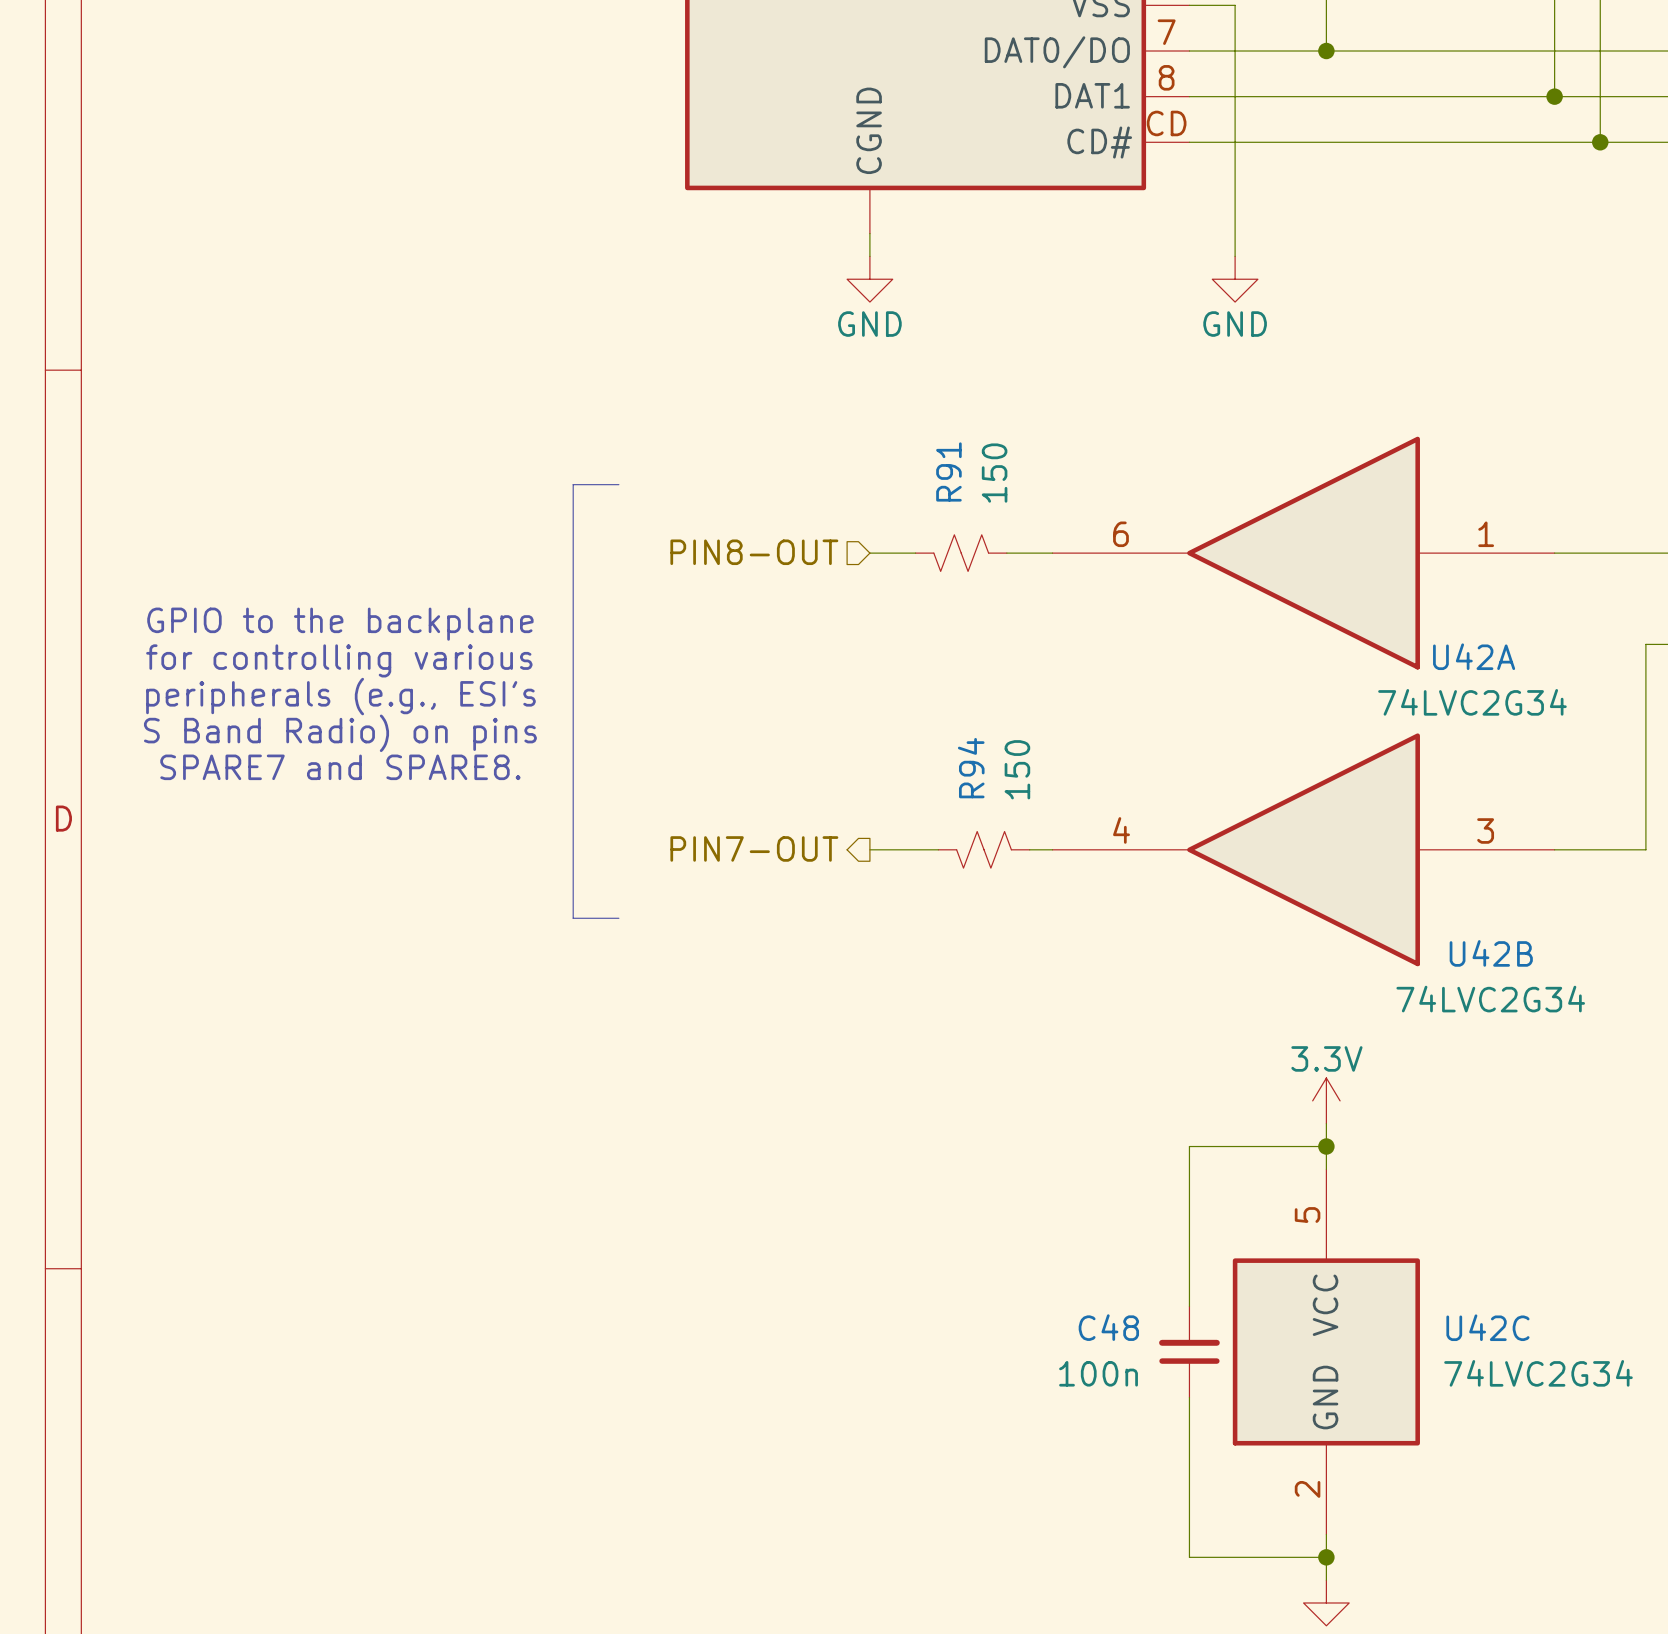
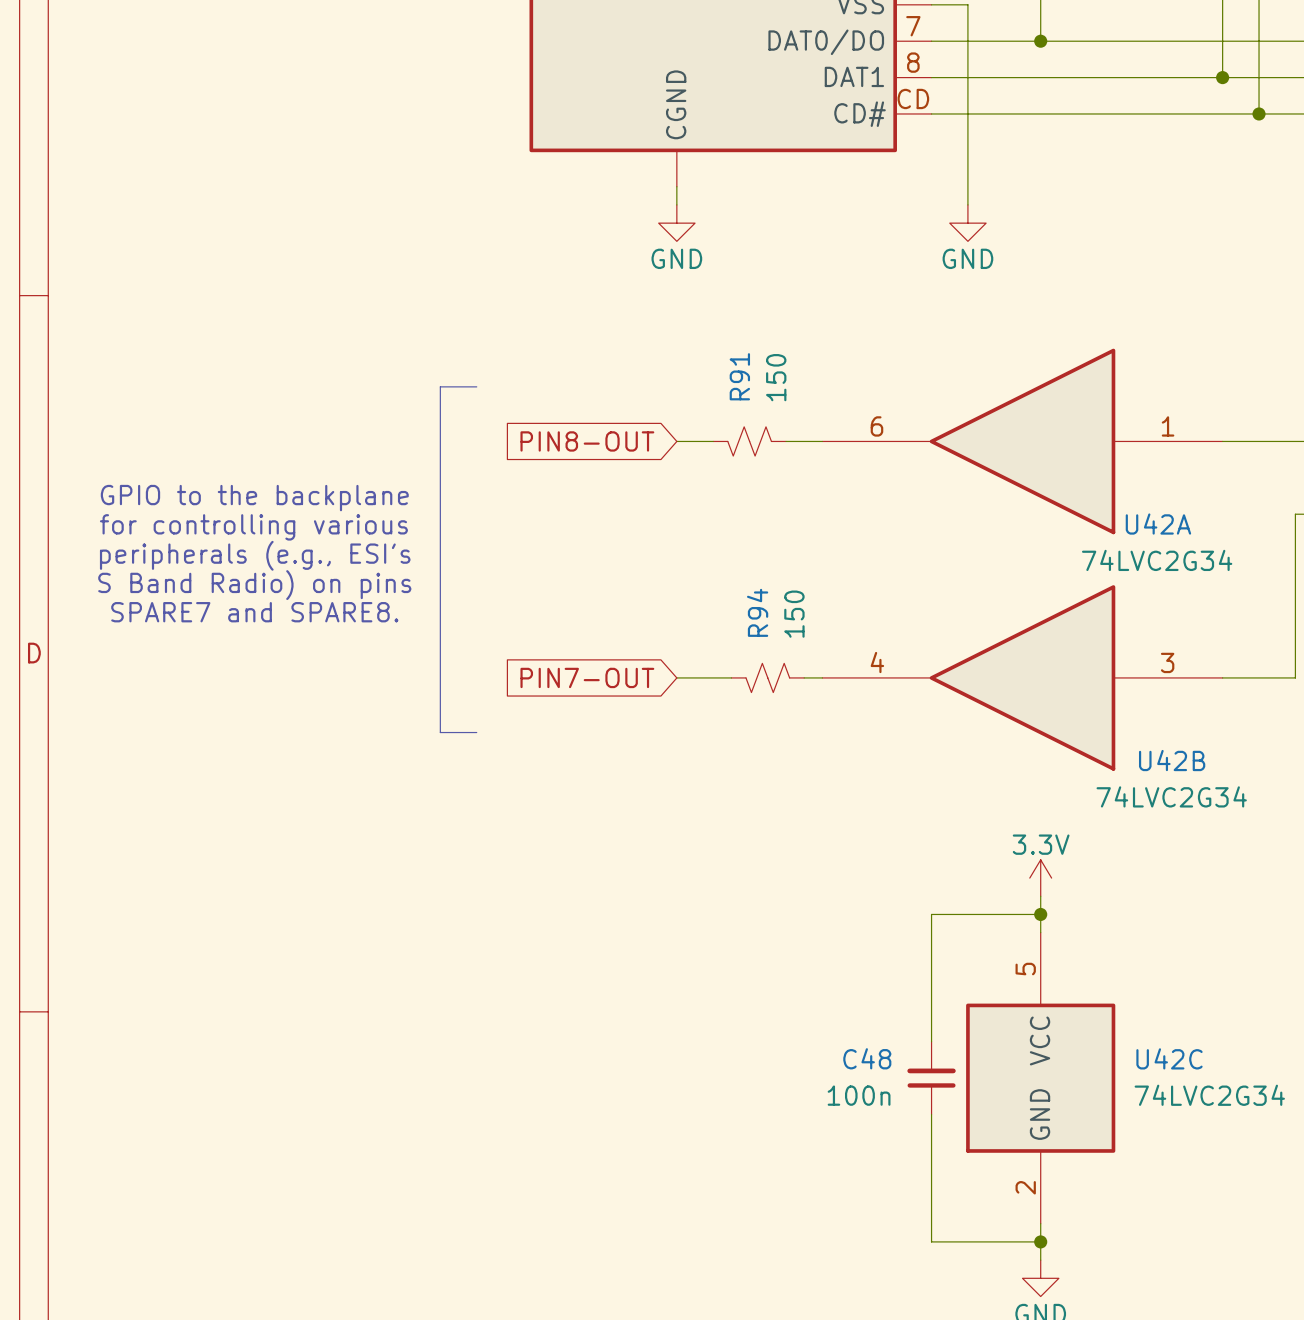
hierarchical label: PIN8-OUT (754, 552) -> none
global label: none -> PIN8-OUT (587, 441)
hierarchical label: PIN7-OUT (754, 848) -> none
global label: none -> PIN7-OUT (587, 677)

